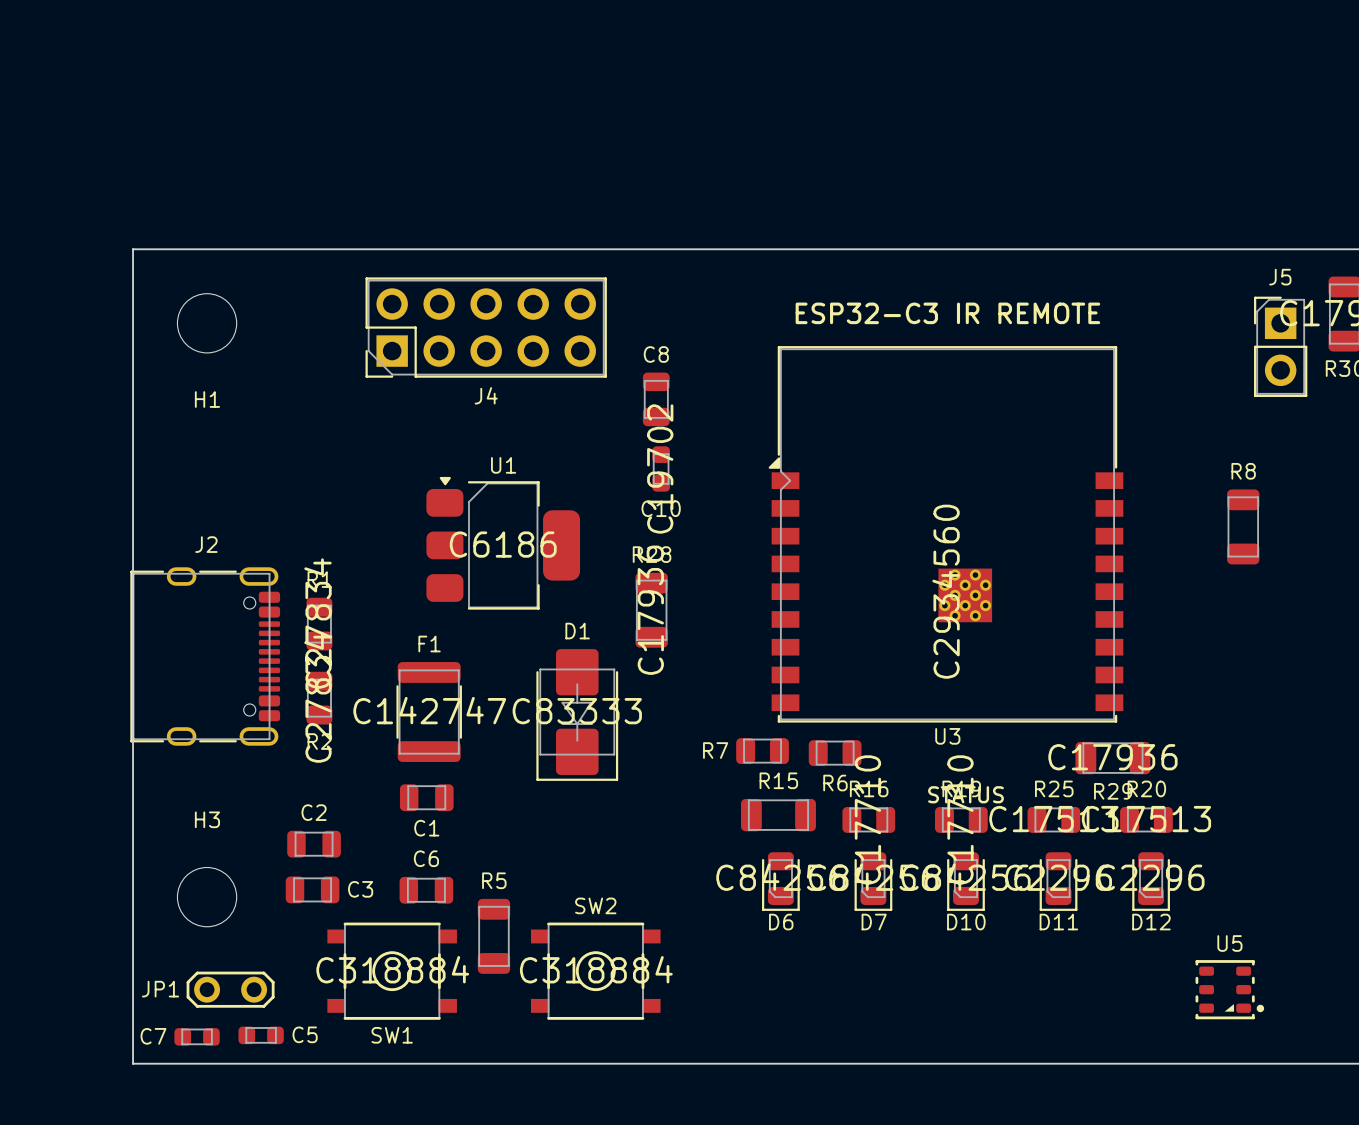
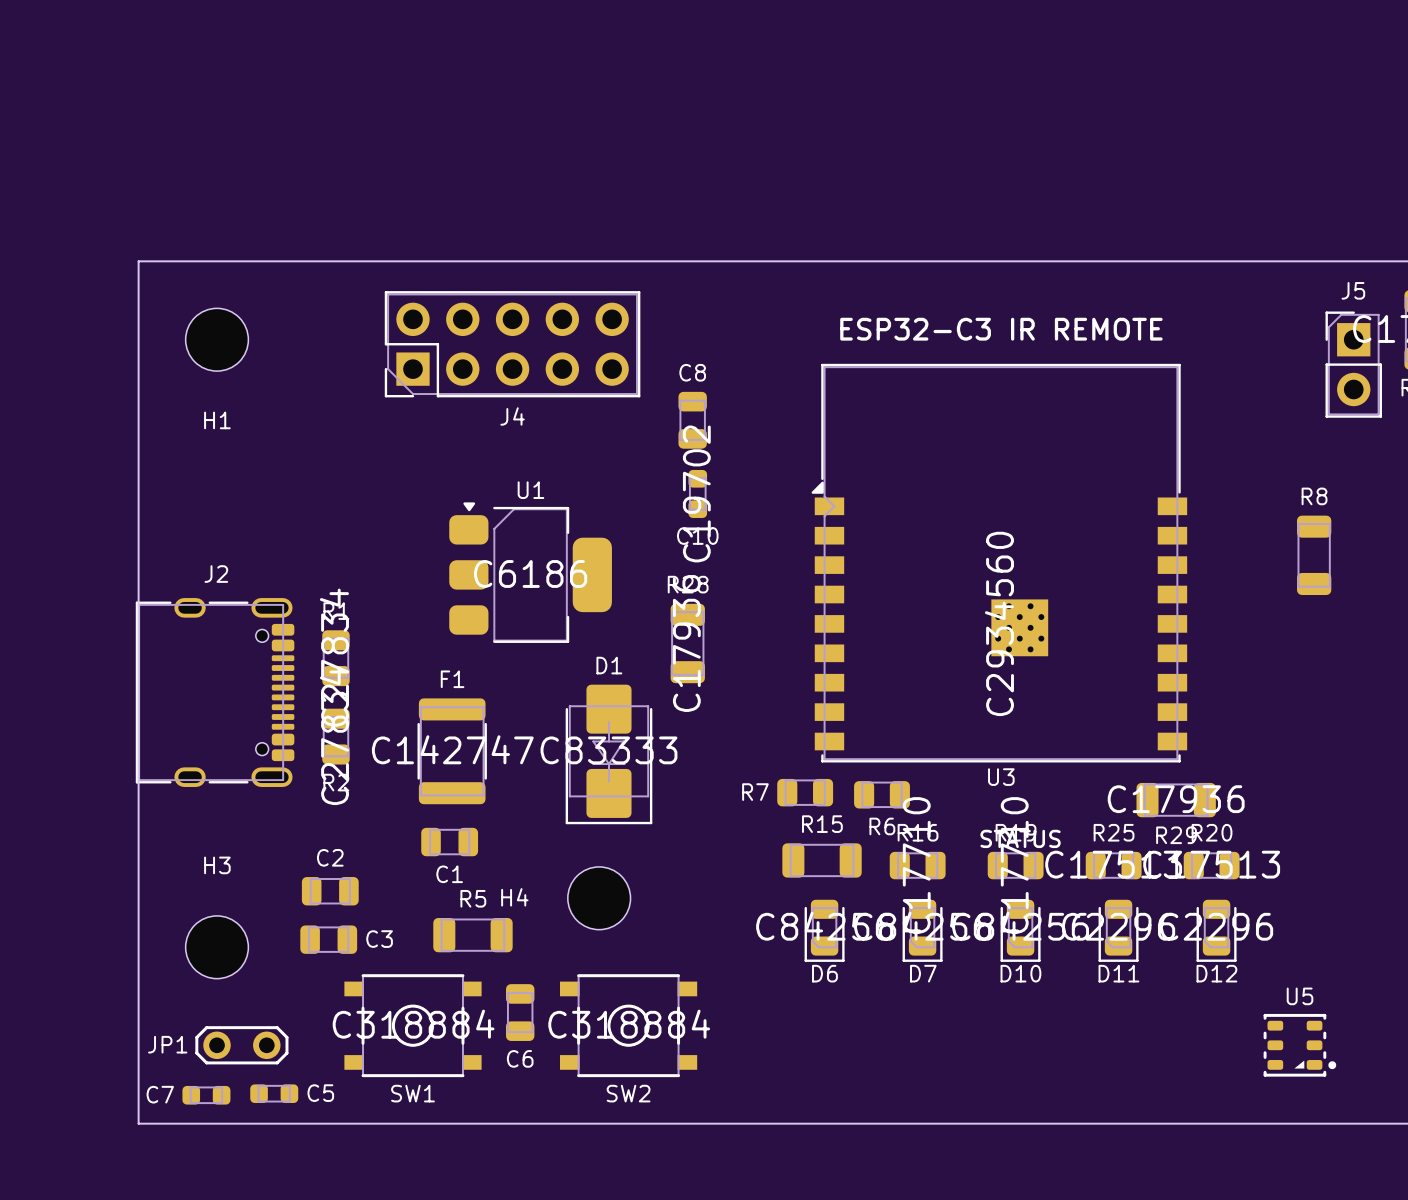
H4: none -> (599, 898)
C6 name position: C6 (426, 858) -> C6 (520, 1058)
C6 rotation: 0° (426, 890) -> 90° clockwise (520, 1012)
C6 position: (426, 890) -> (520, 1012)
SW2 name position: SW2 (595, 905) -> SW2 (628, 1093)
R5 rotation: 0° (493, 936) -> 90° clockwise (472, 935)
R5 position: (493, 936) -> (472, 935)

